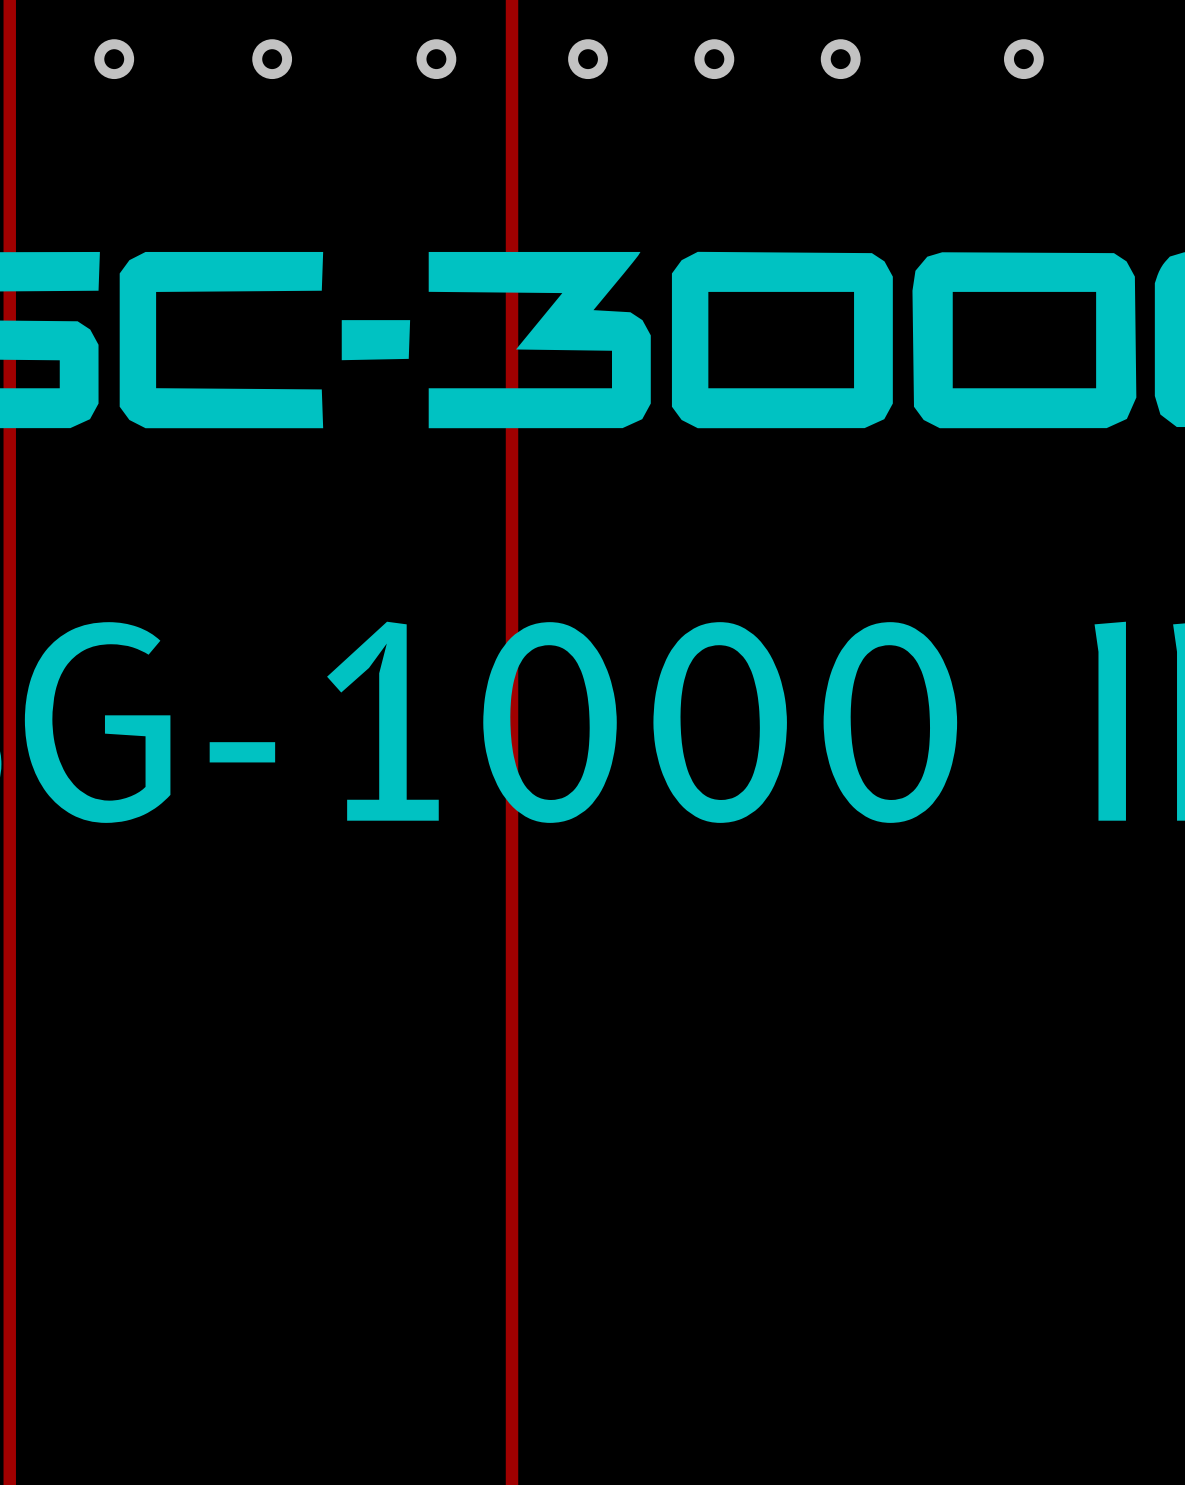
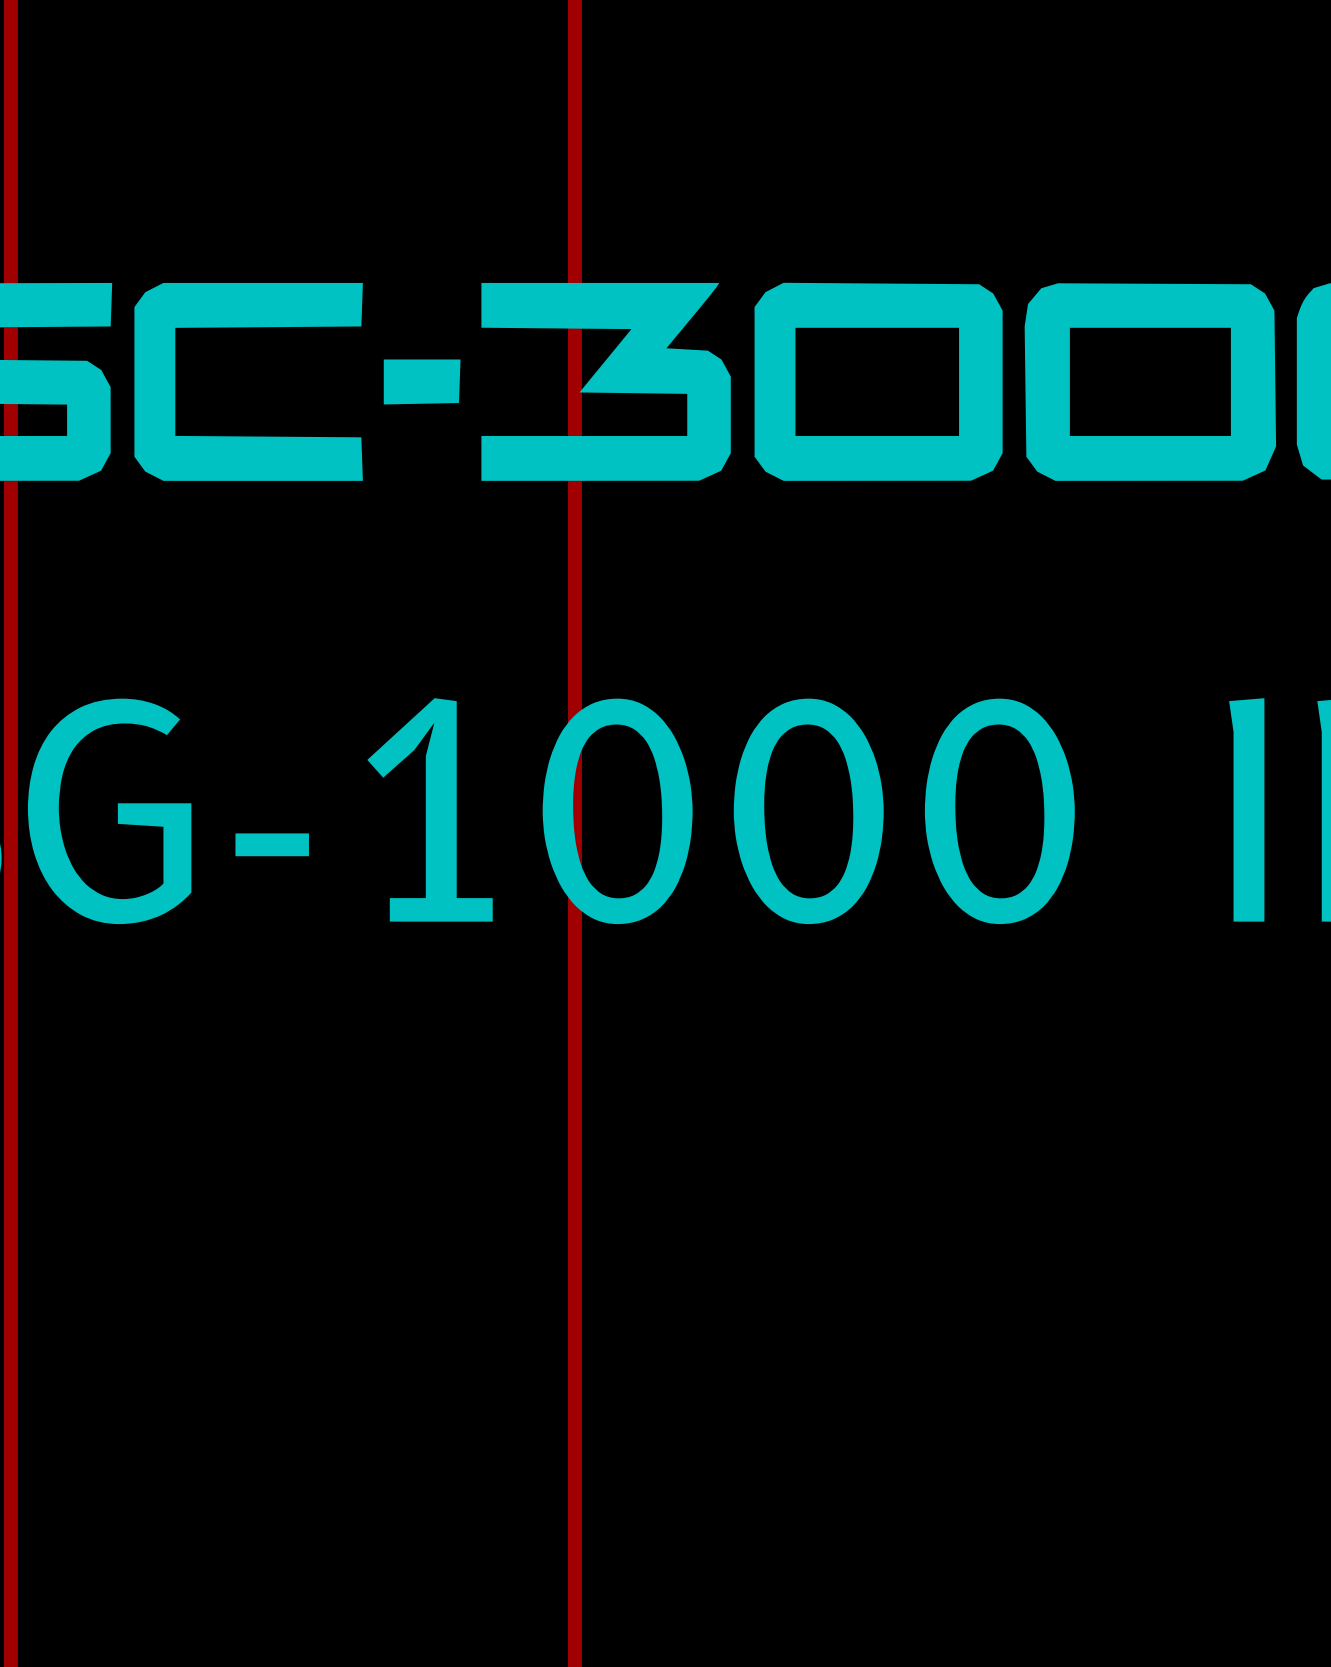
via: (114, 59) -> none
via: (272, 59) -> none
via: (436, 59) -> none
via: (588, 59) -> none
via: (714, 59) -> none
via: (840, 59) -> none
via: (1023, 59) -> none

